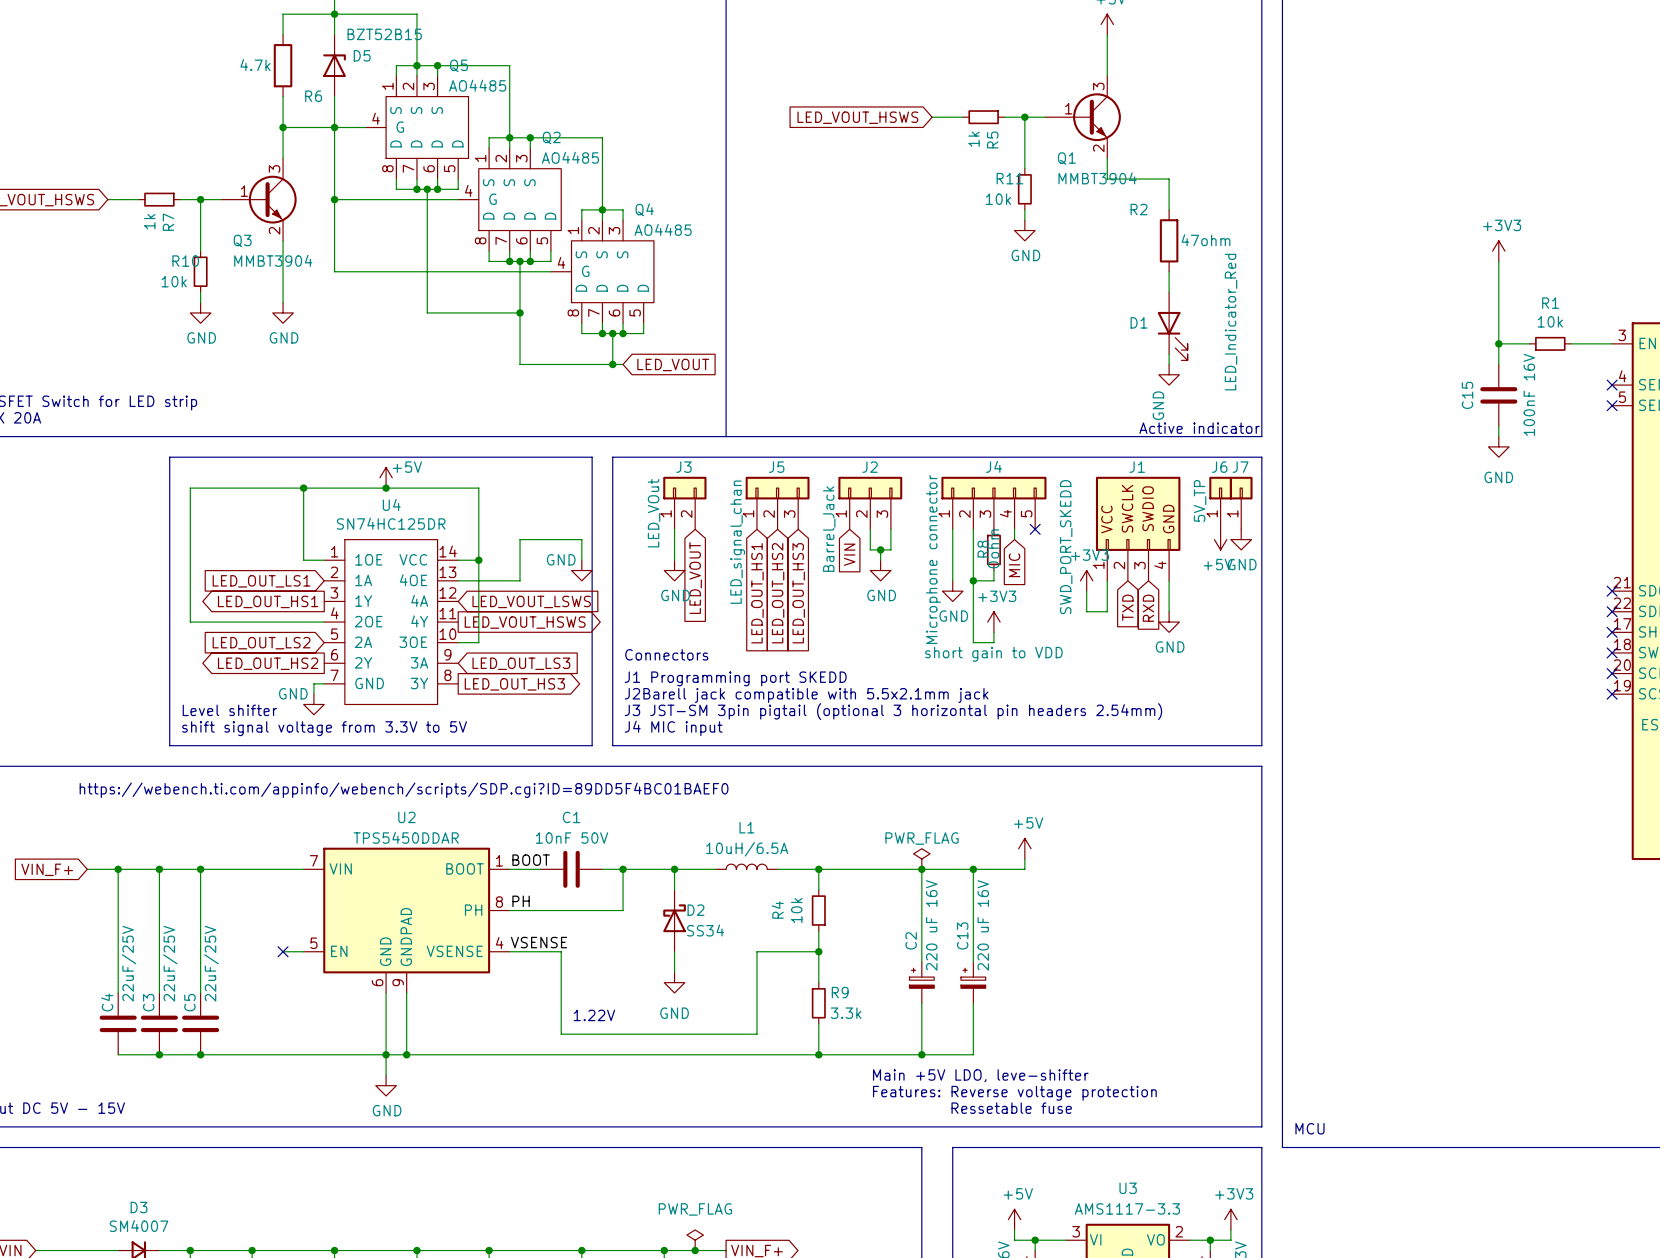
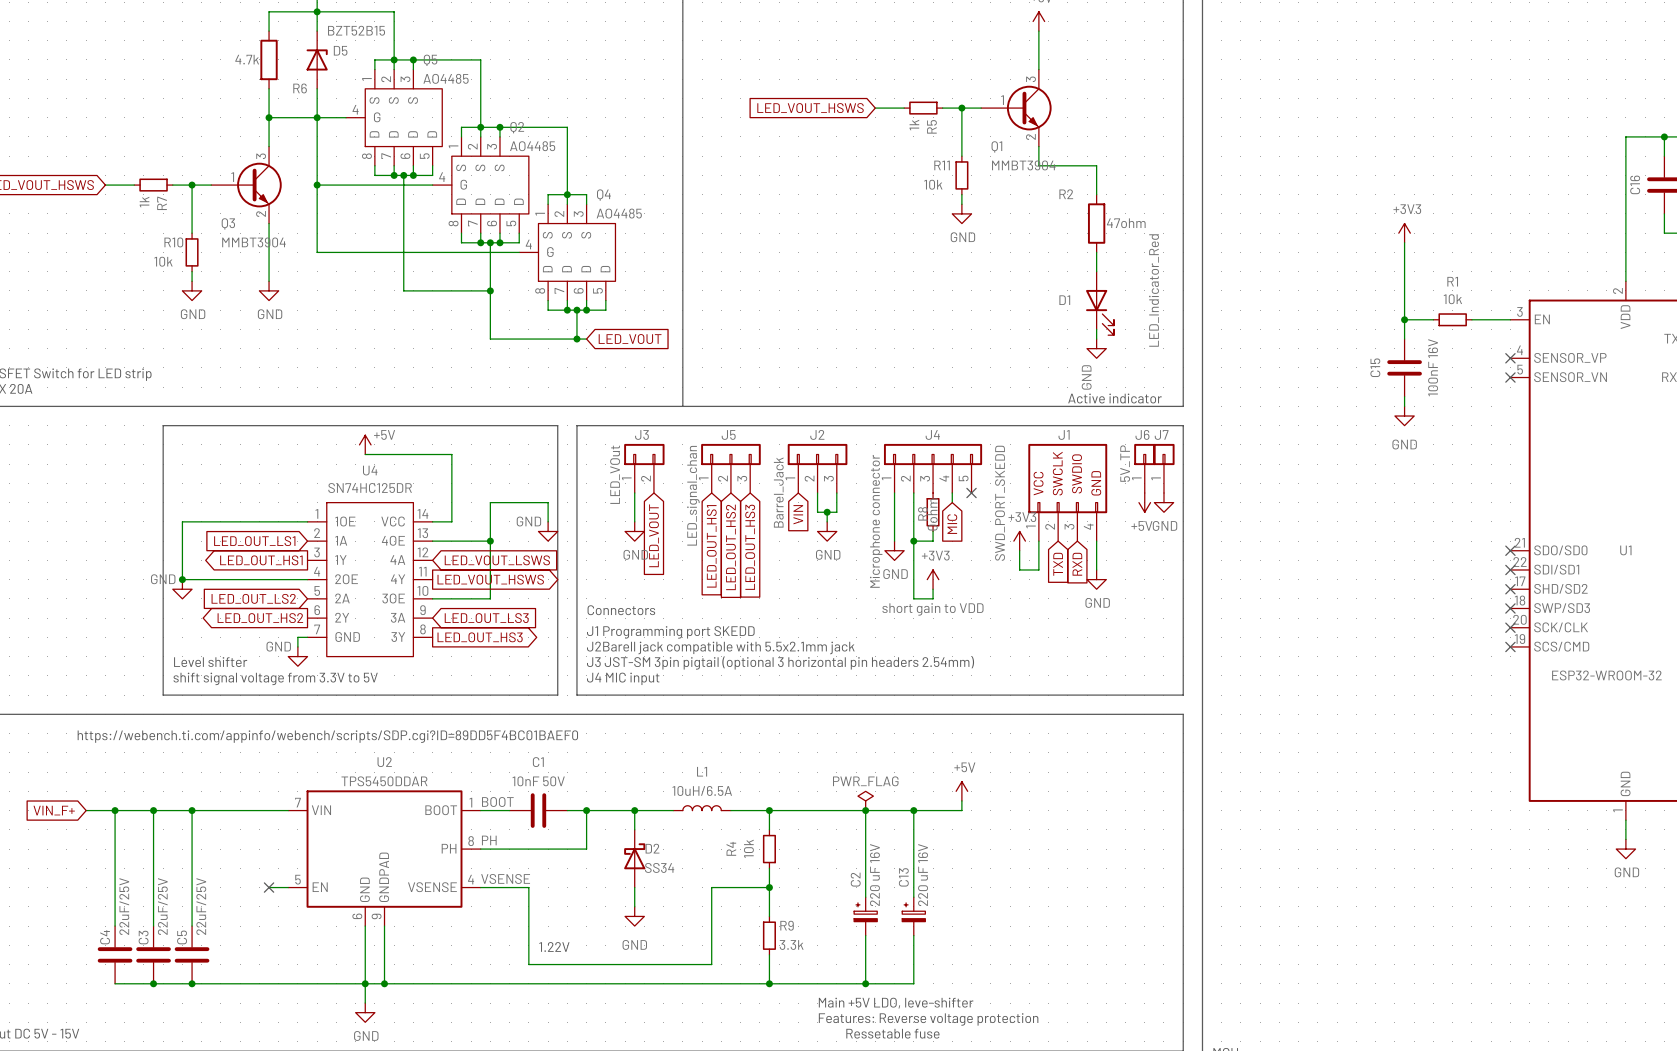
wire: (303, 488) (303, 560) -> none
junction: (303, 488) -> none
wire: (386, 488) (190, 488) (190, 560) -> (288, 521) (182, 521)
junction: (386, 488) -> none
wire: (478, 560) (478, 642) -> (490, 541) (490, 598) (451, 598)
junction position: (478, 560) -> (490, 541)
junction: none -> (182, 579)
power symbol: none -> GND (182, 589)

